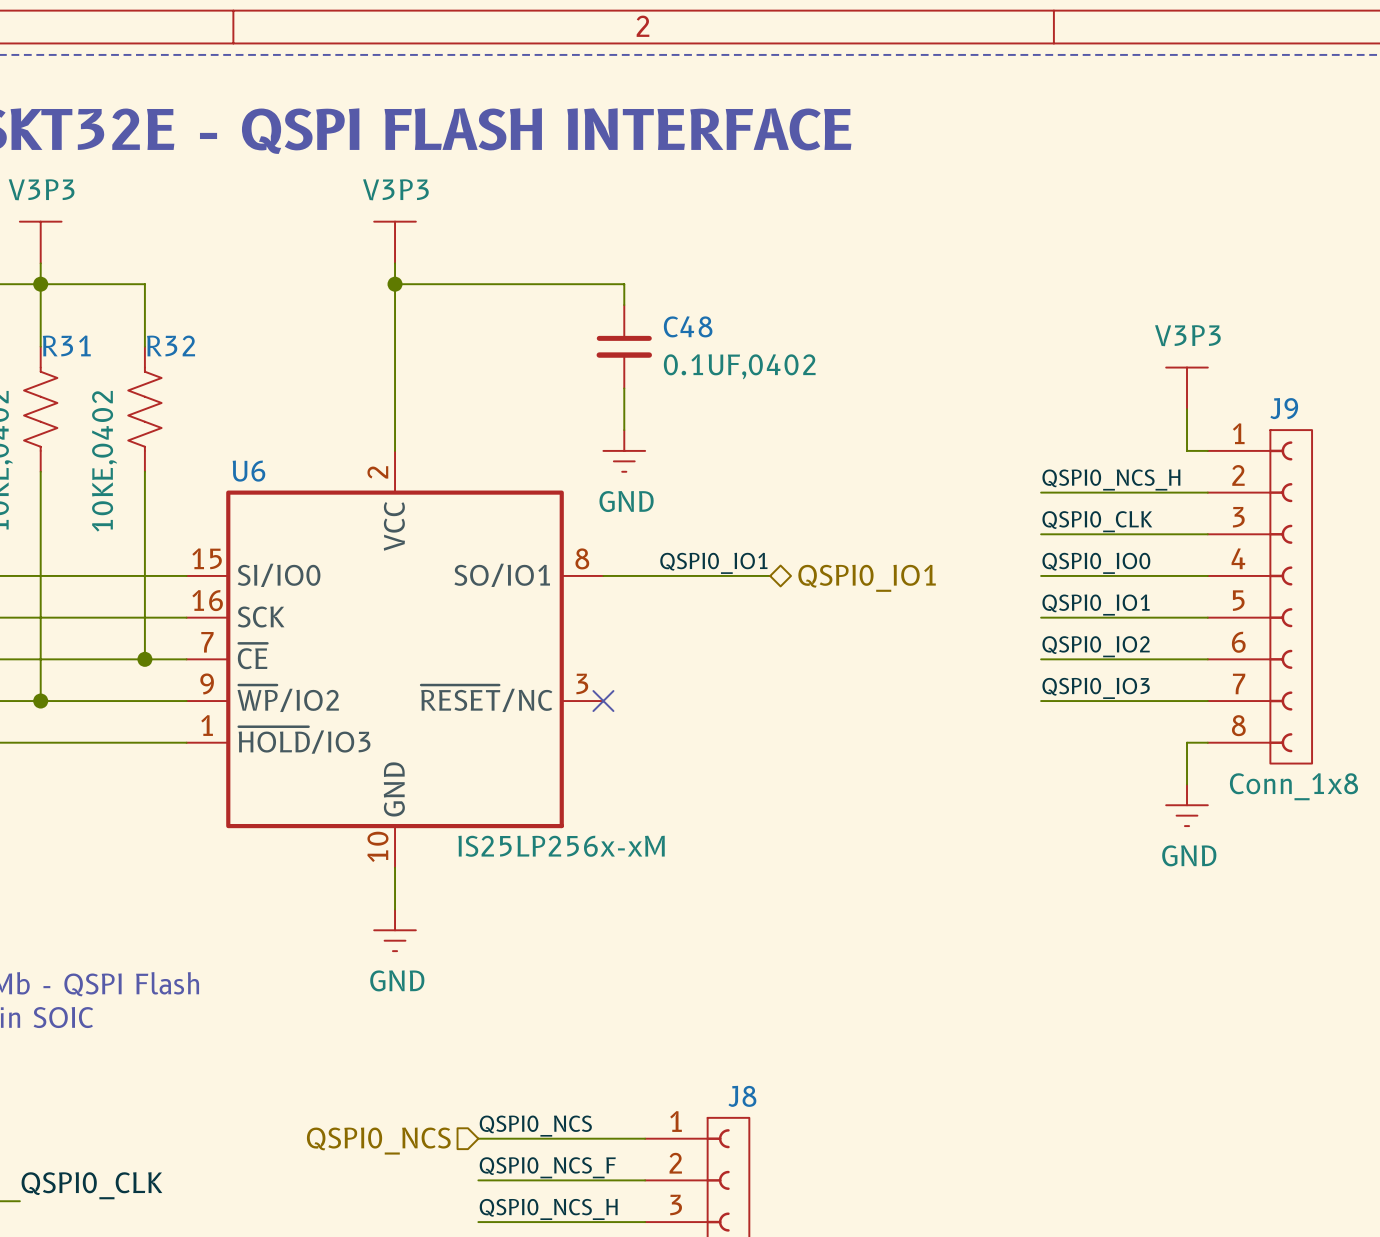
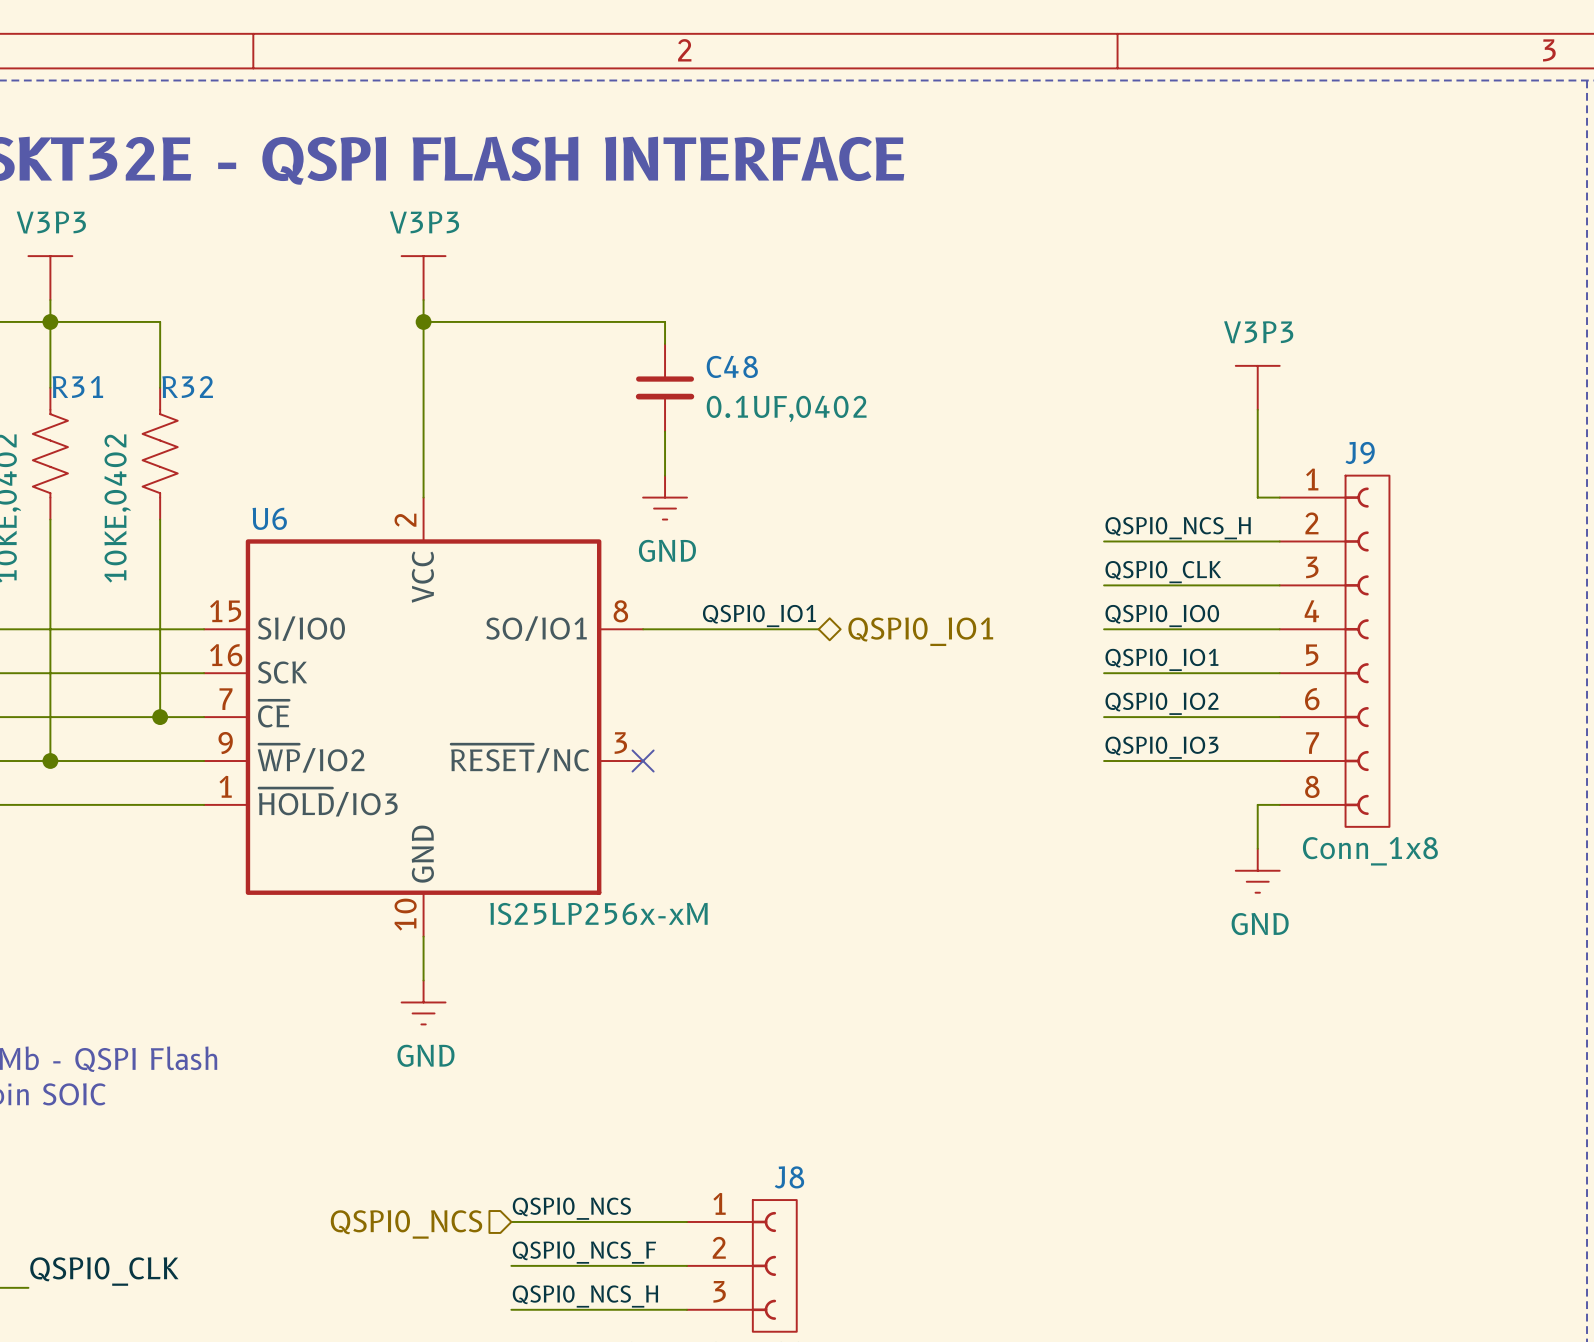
power symbol position: V3P3 (1187, 388) -> V3P3 (1257, 387)

